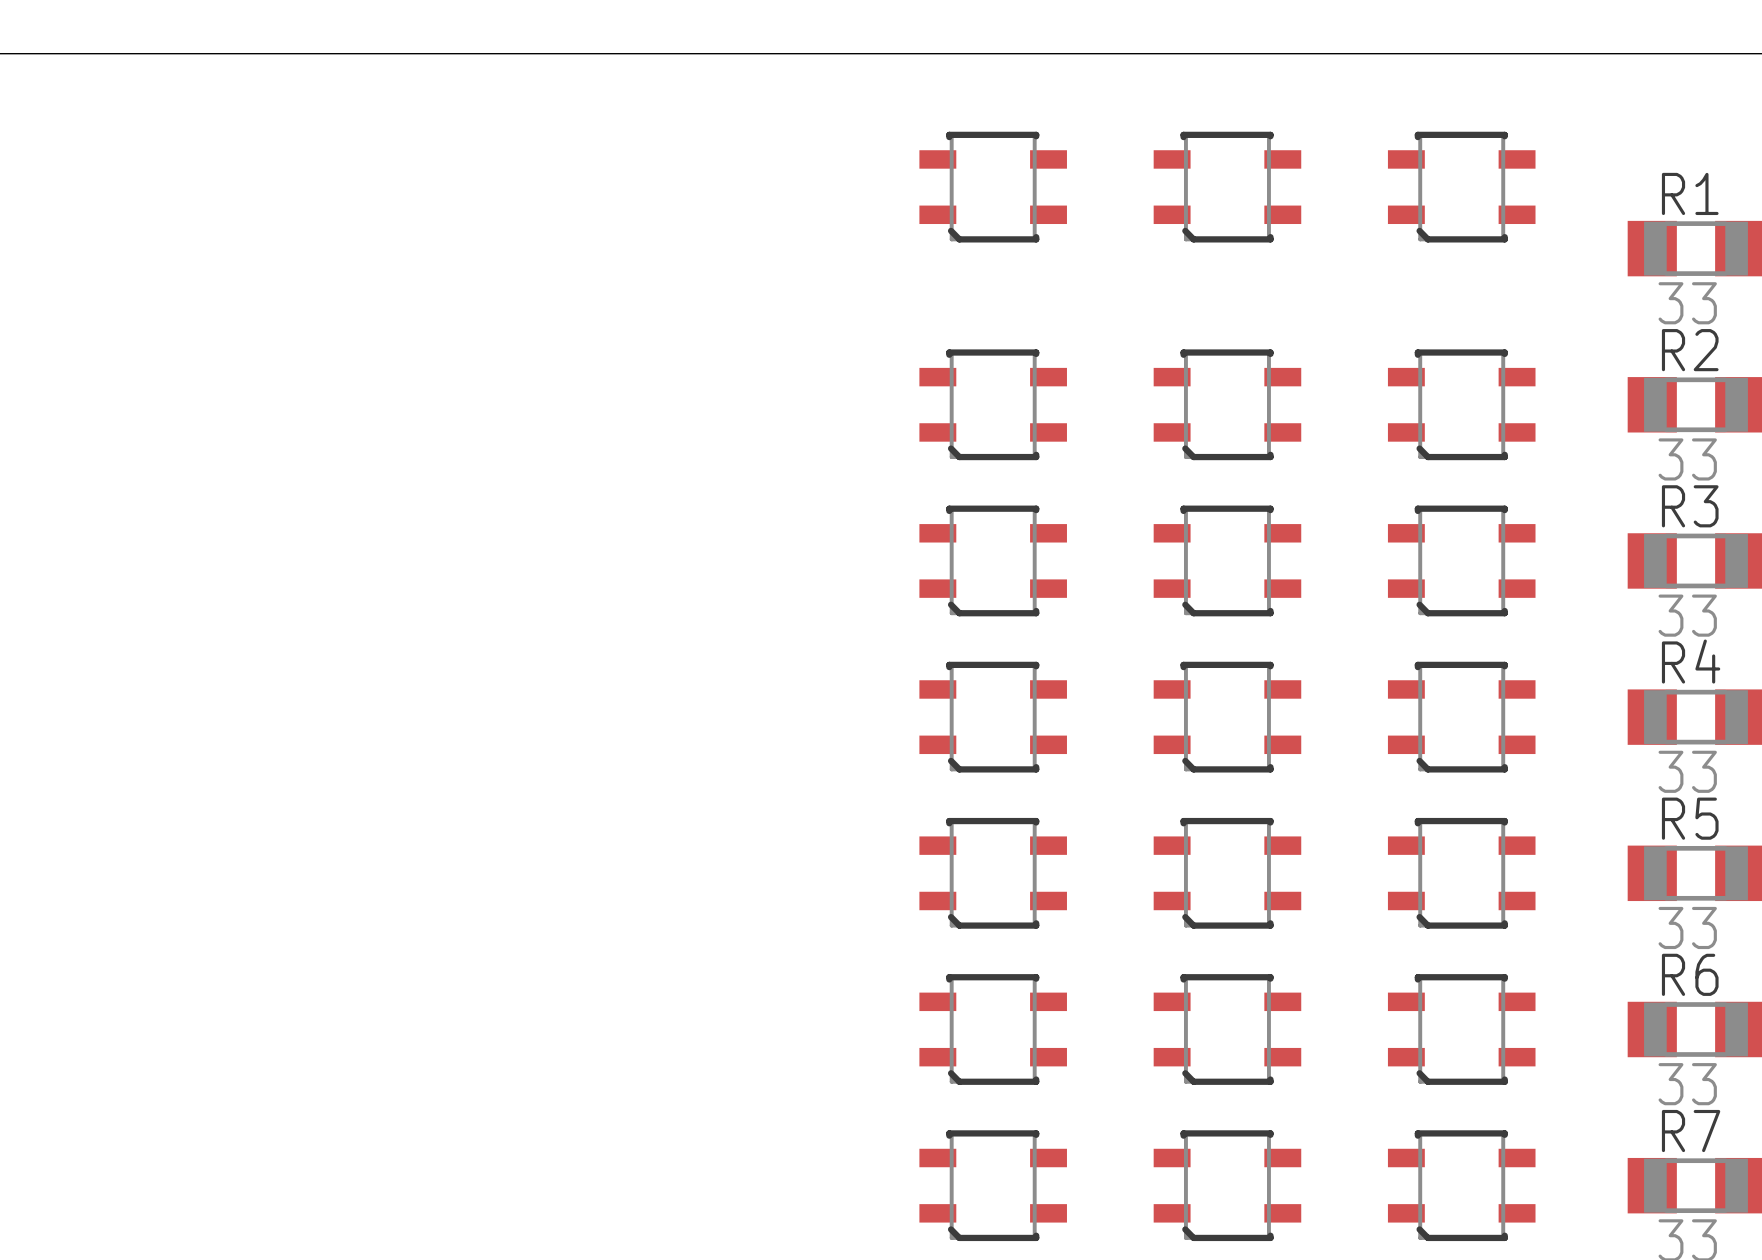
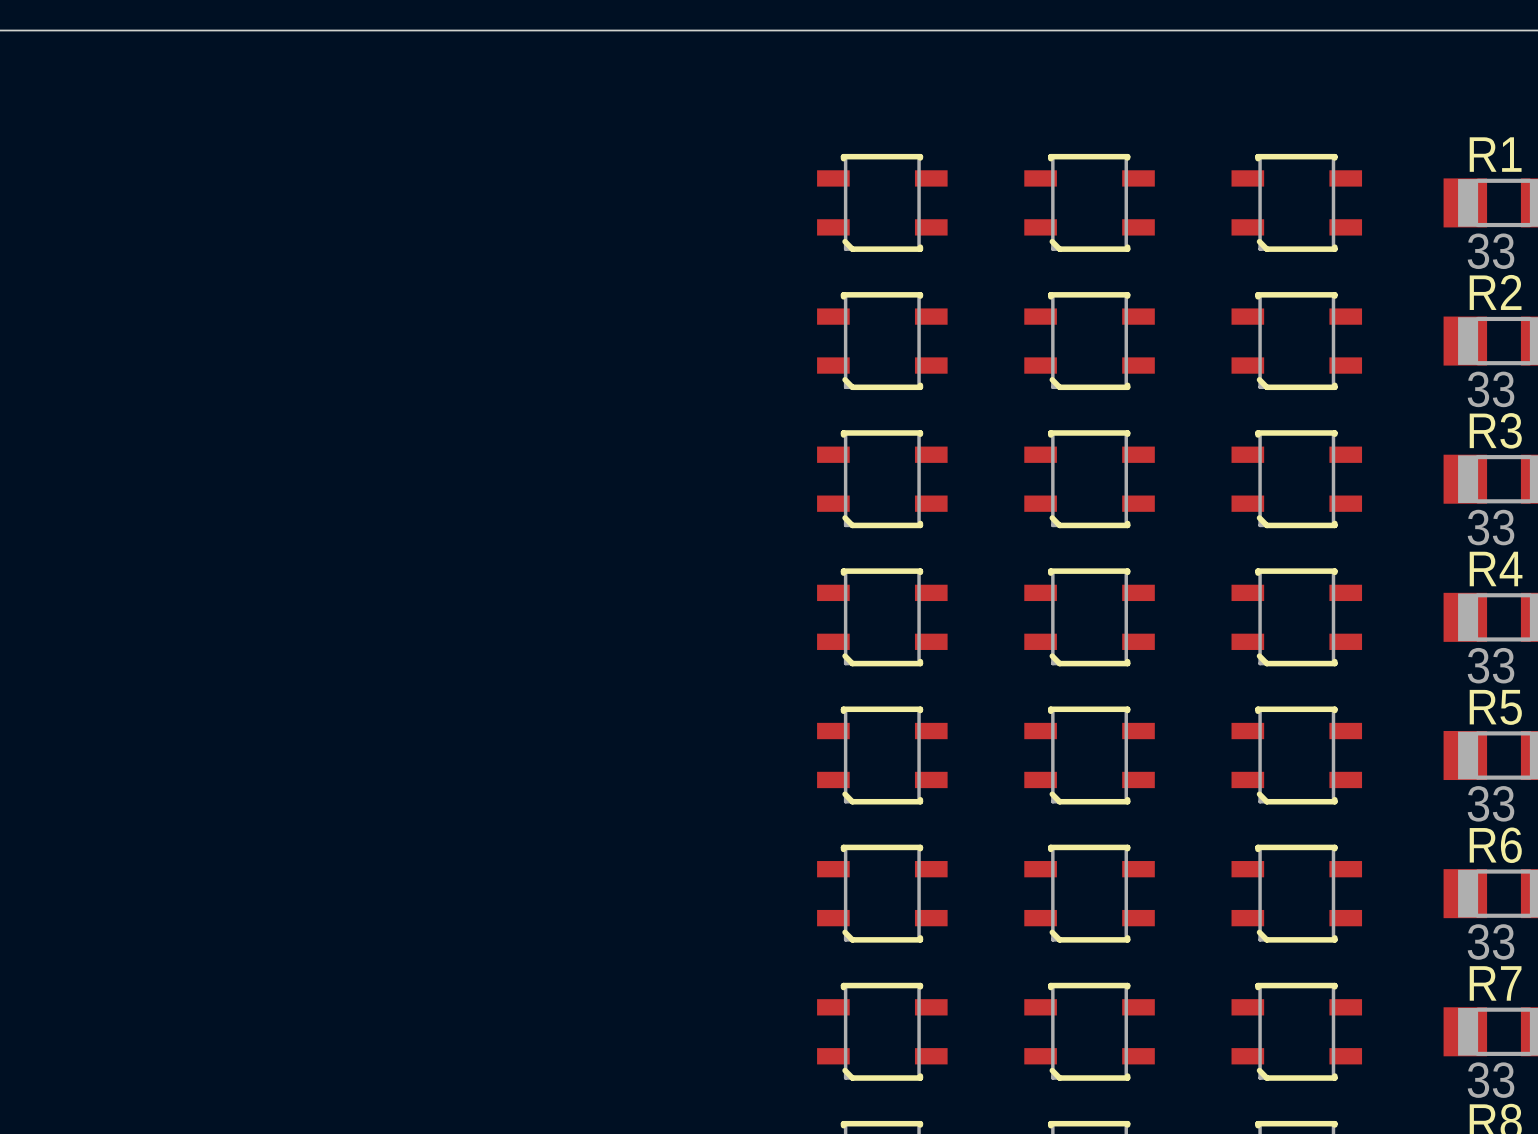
part position: (993, 187) -> (882, 202)
part position: (1227, 187) -> (1089, 202)
part position: (1461, 187) -> (1296, 202)

